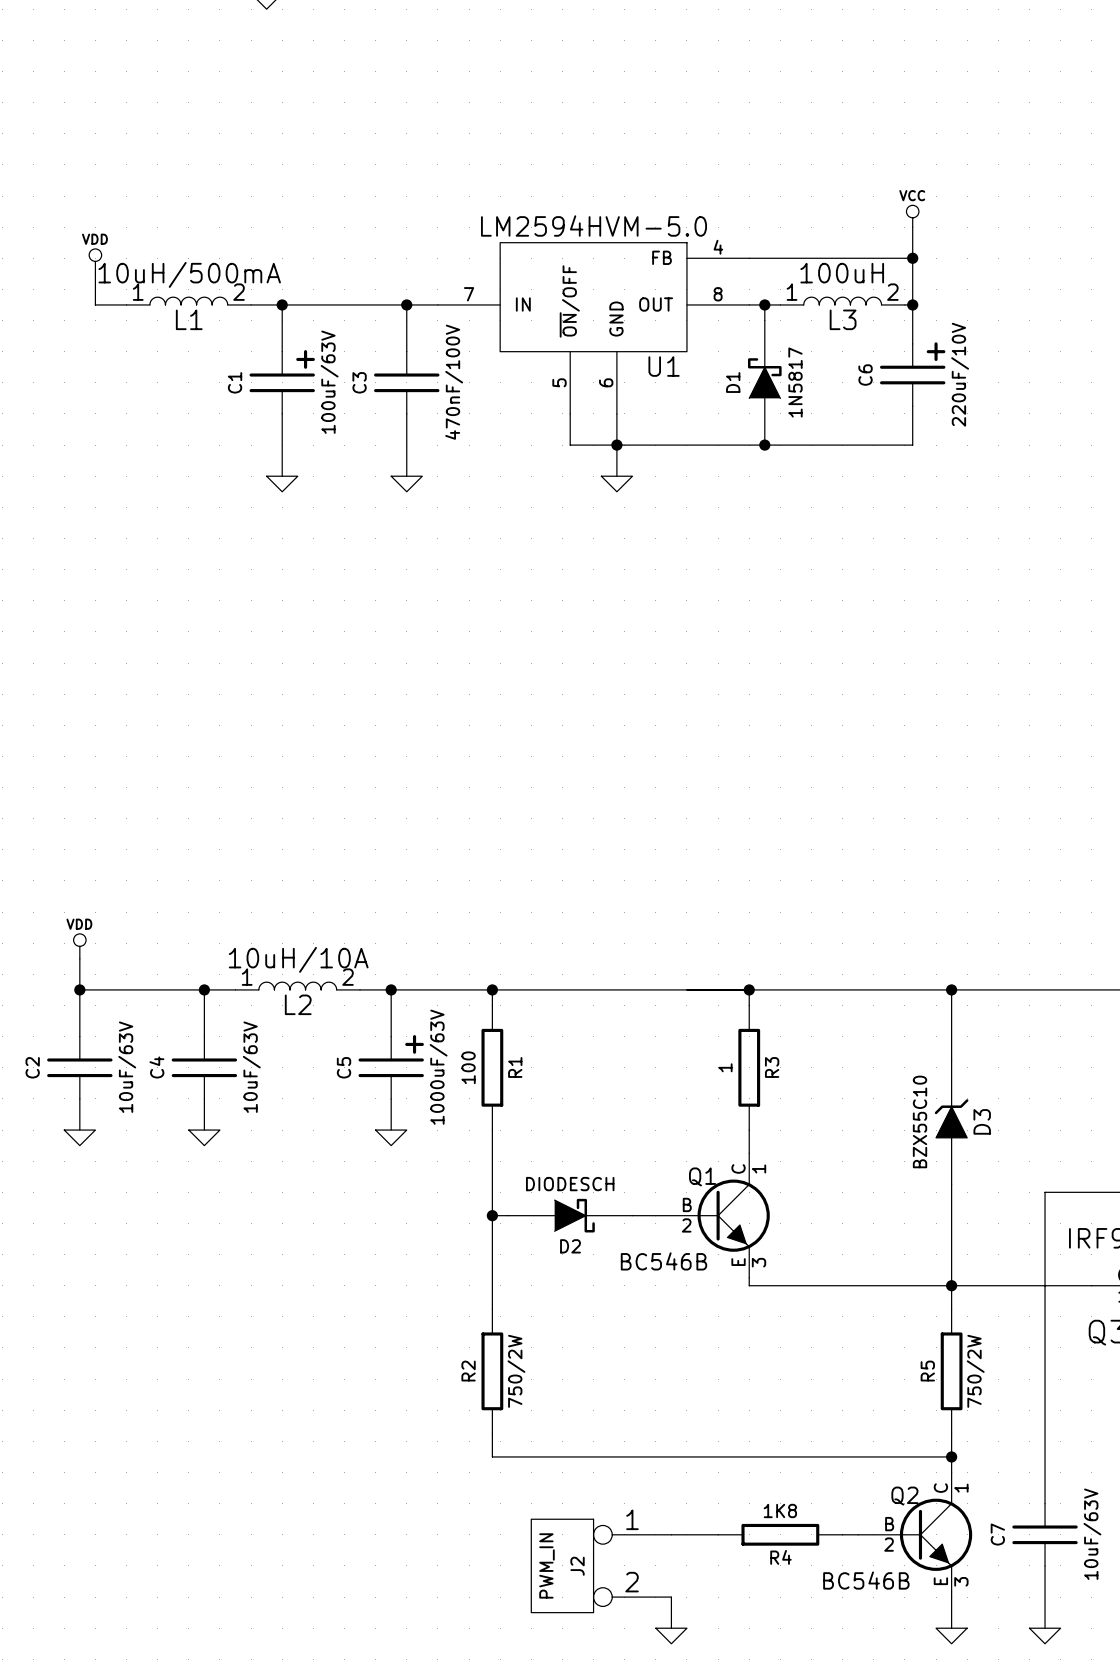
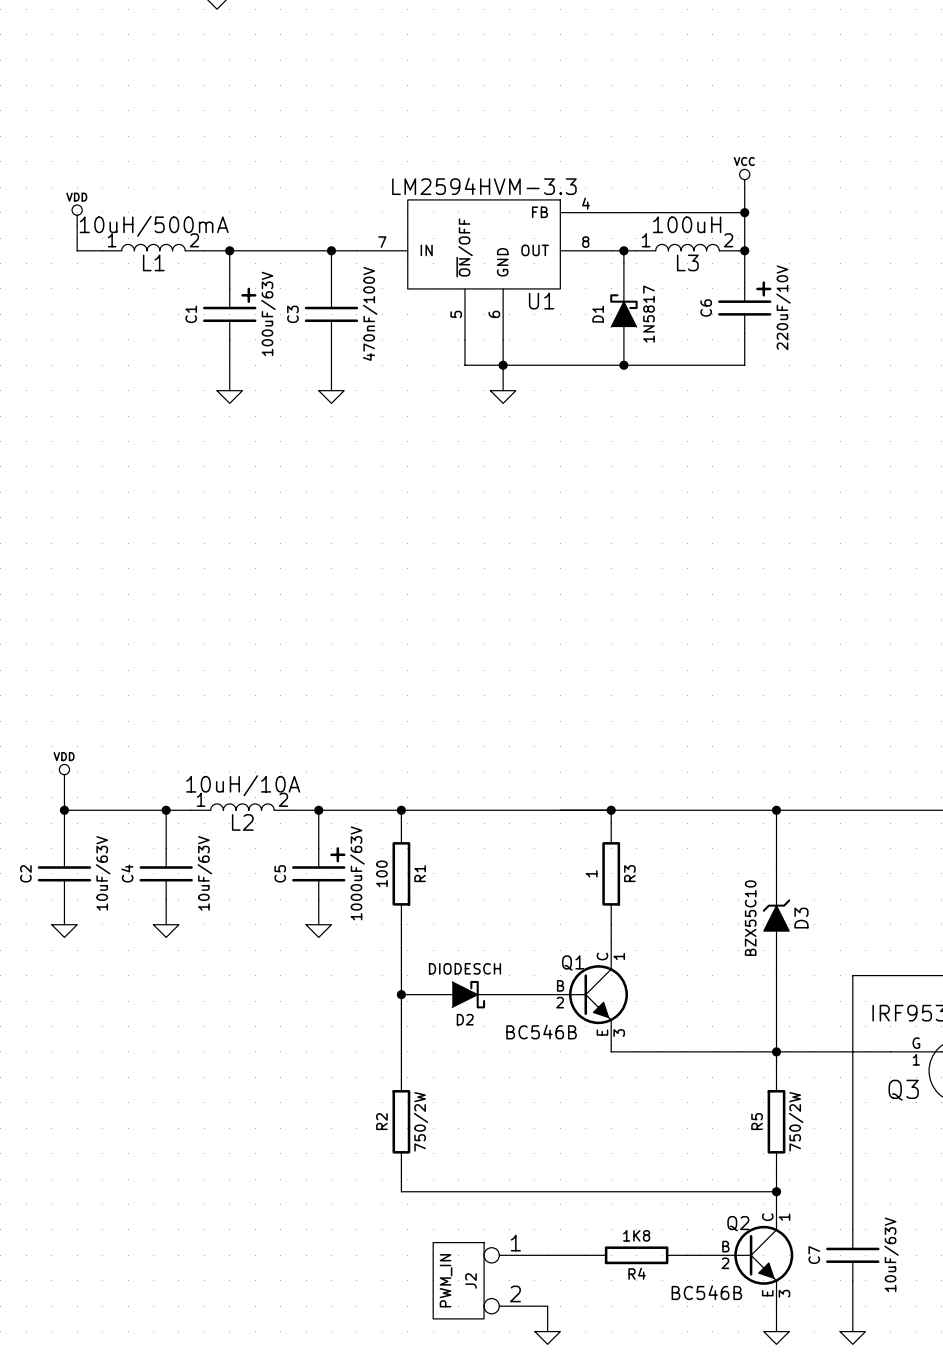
U1 value: LM2594HVM-5.0 (594, 225) -> LM2594HVM-3.3 (484, 186)

